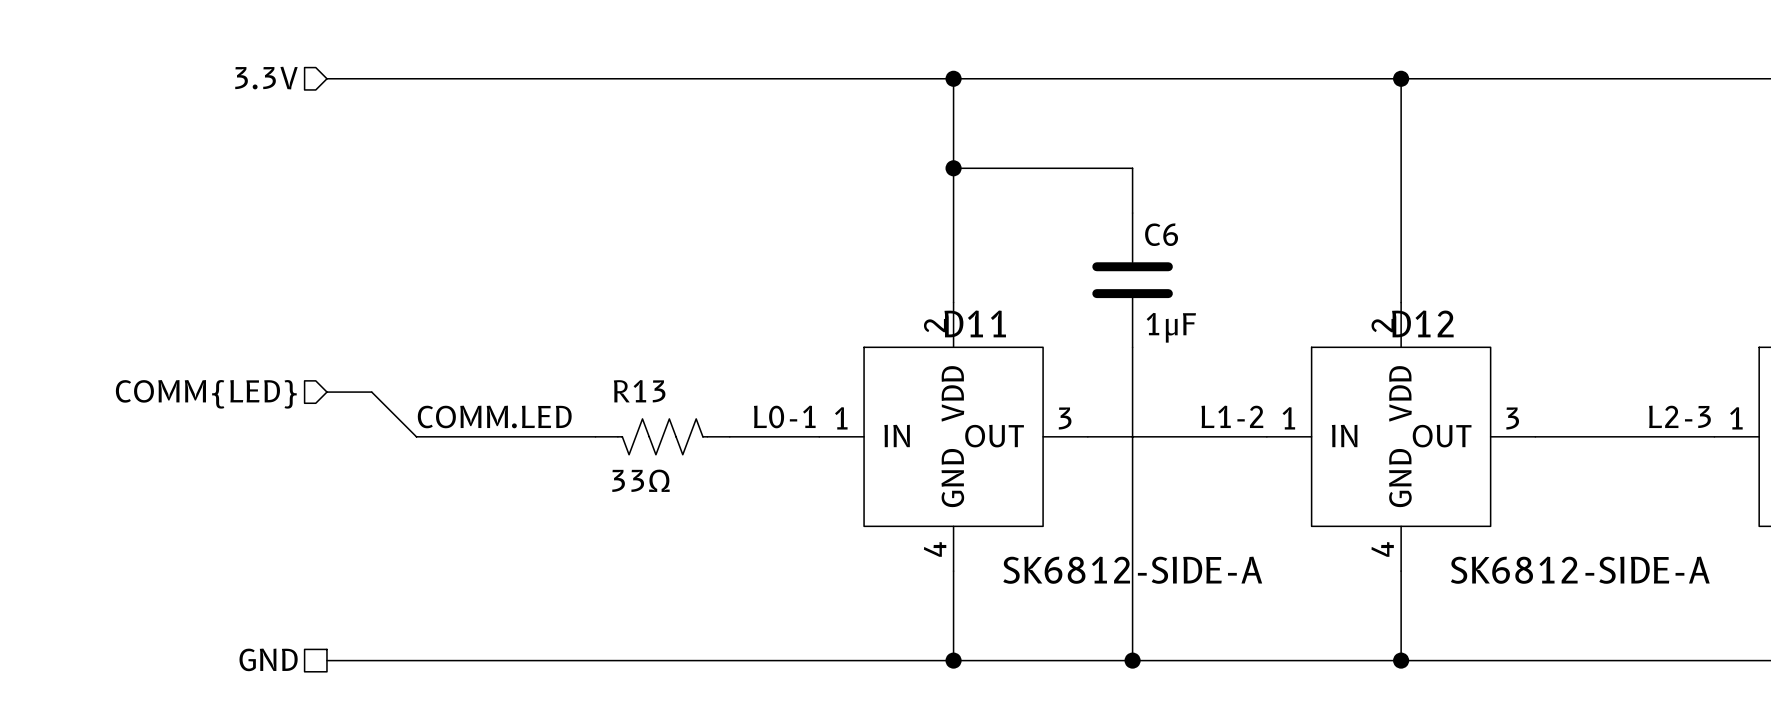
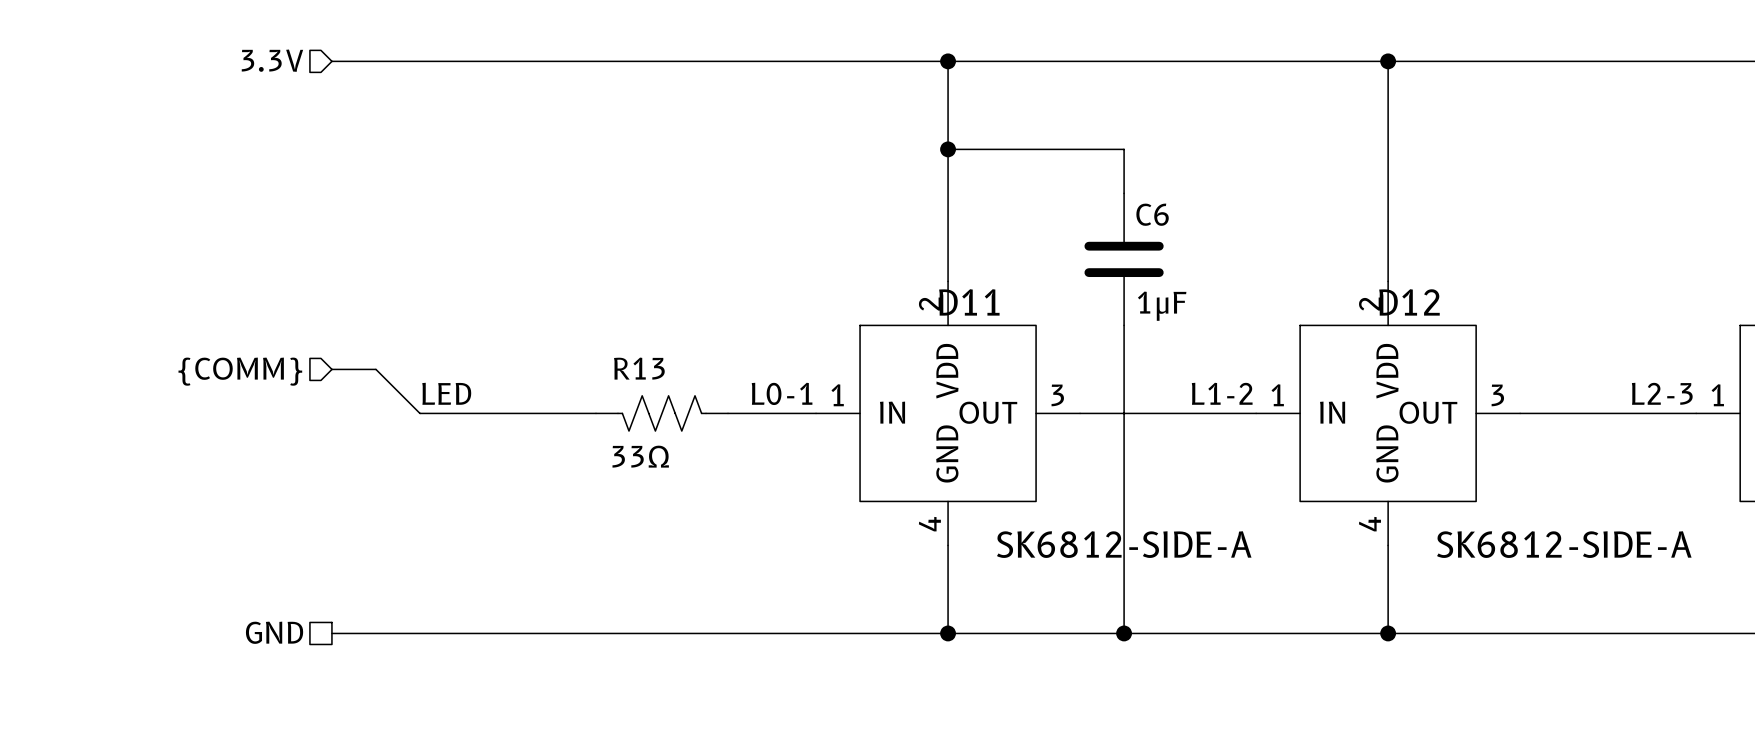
hierarchical label: COMM{LED} (206, 394) -> {COMM} (240, 371)
label: COMM.LED (494, 416) -> LED (446, 393)

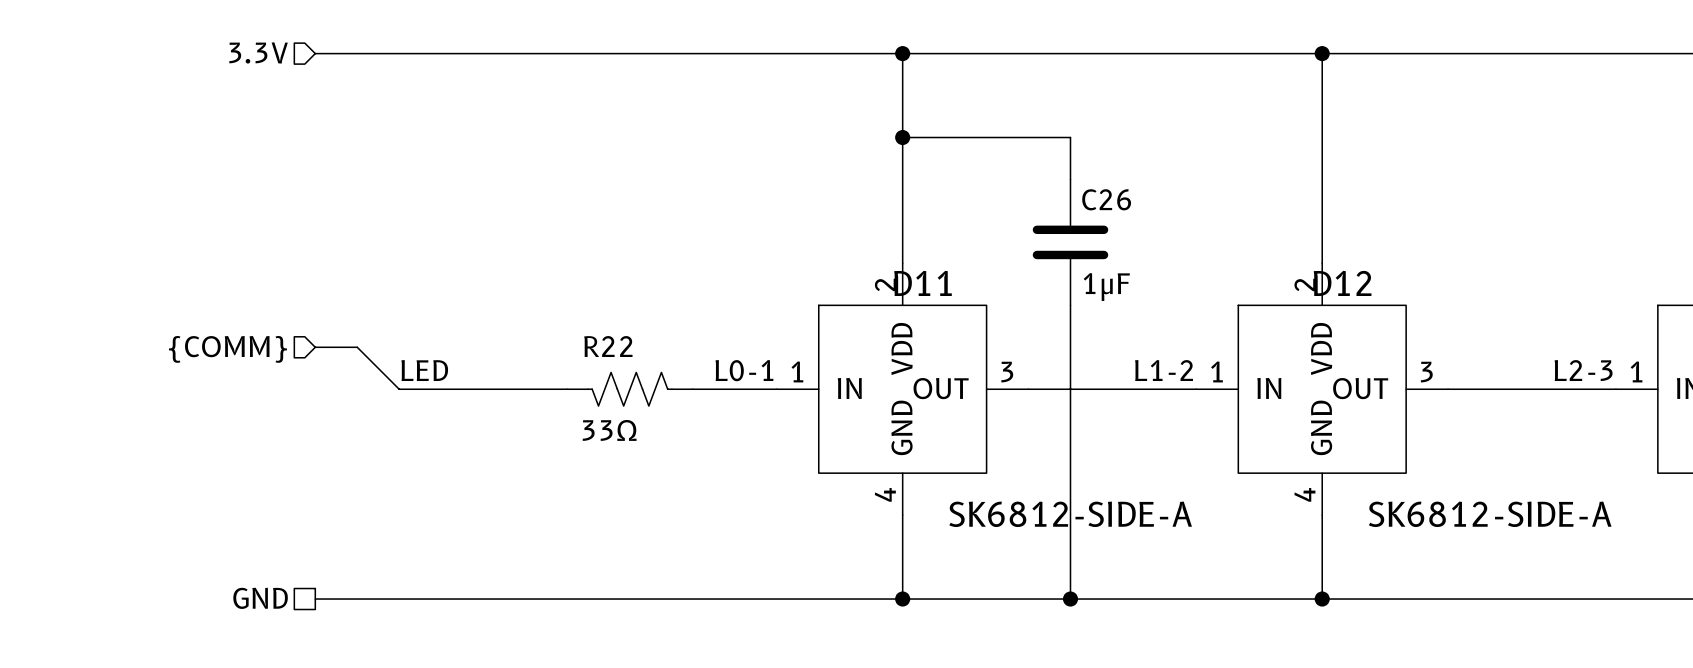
C6 name: C6 (1152, 214) -> C26 (1106, 199)
R13 name: R13 (639, 368) -> R22 (608, 346)

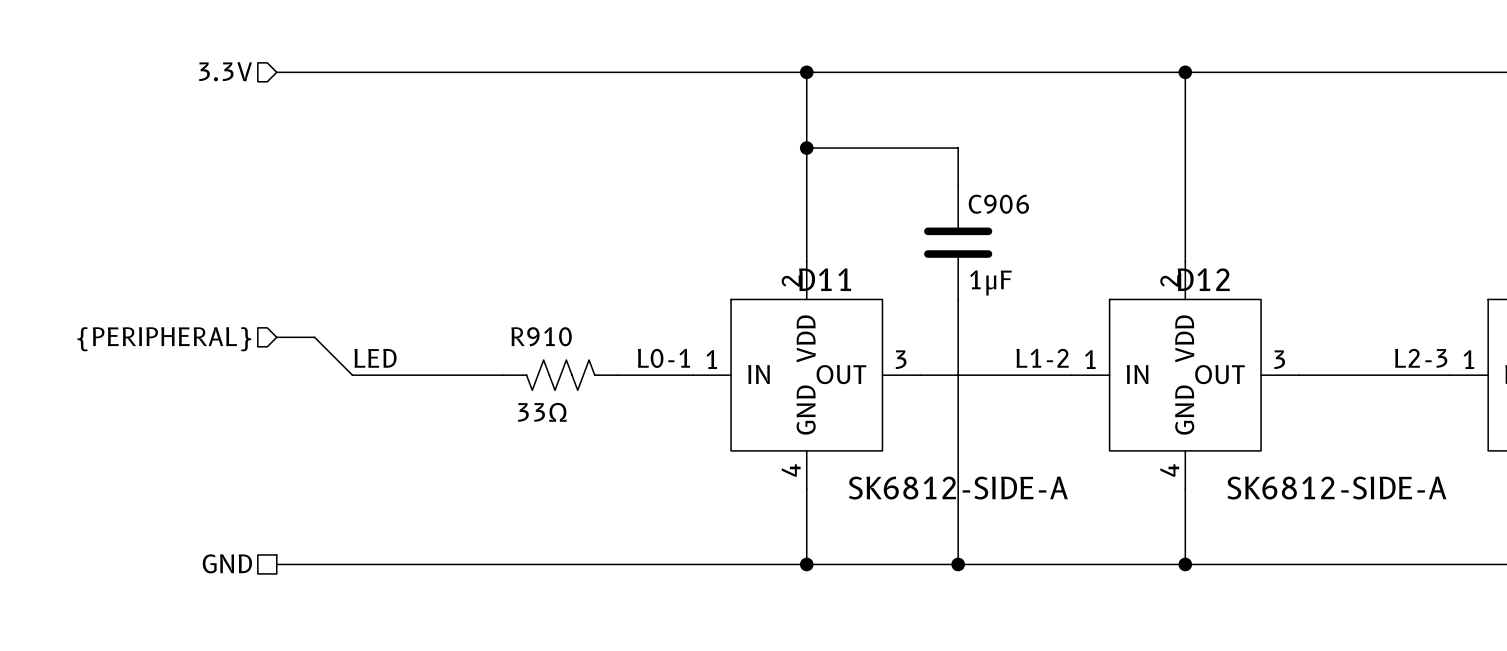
C26 name: C26 (1106, 199) -> C906 (998, 204)
R22 name: R22 (608, 346) -> R910 (541, 336)
hierarchical label: {COMM} (227, 349) -> {PERIPHERAL} (164, 339)

